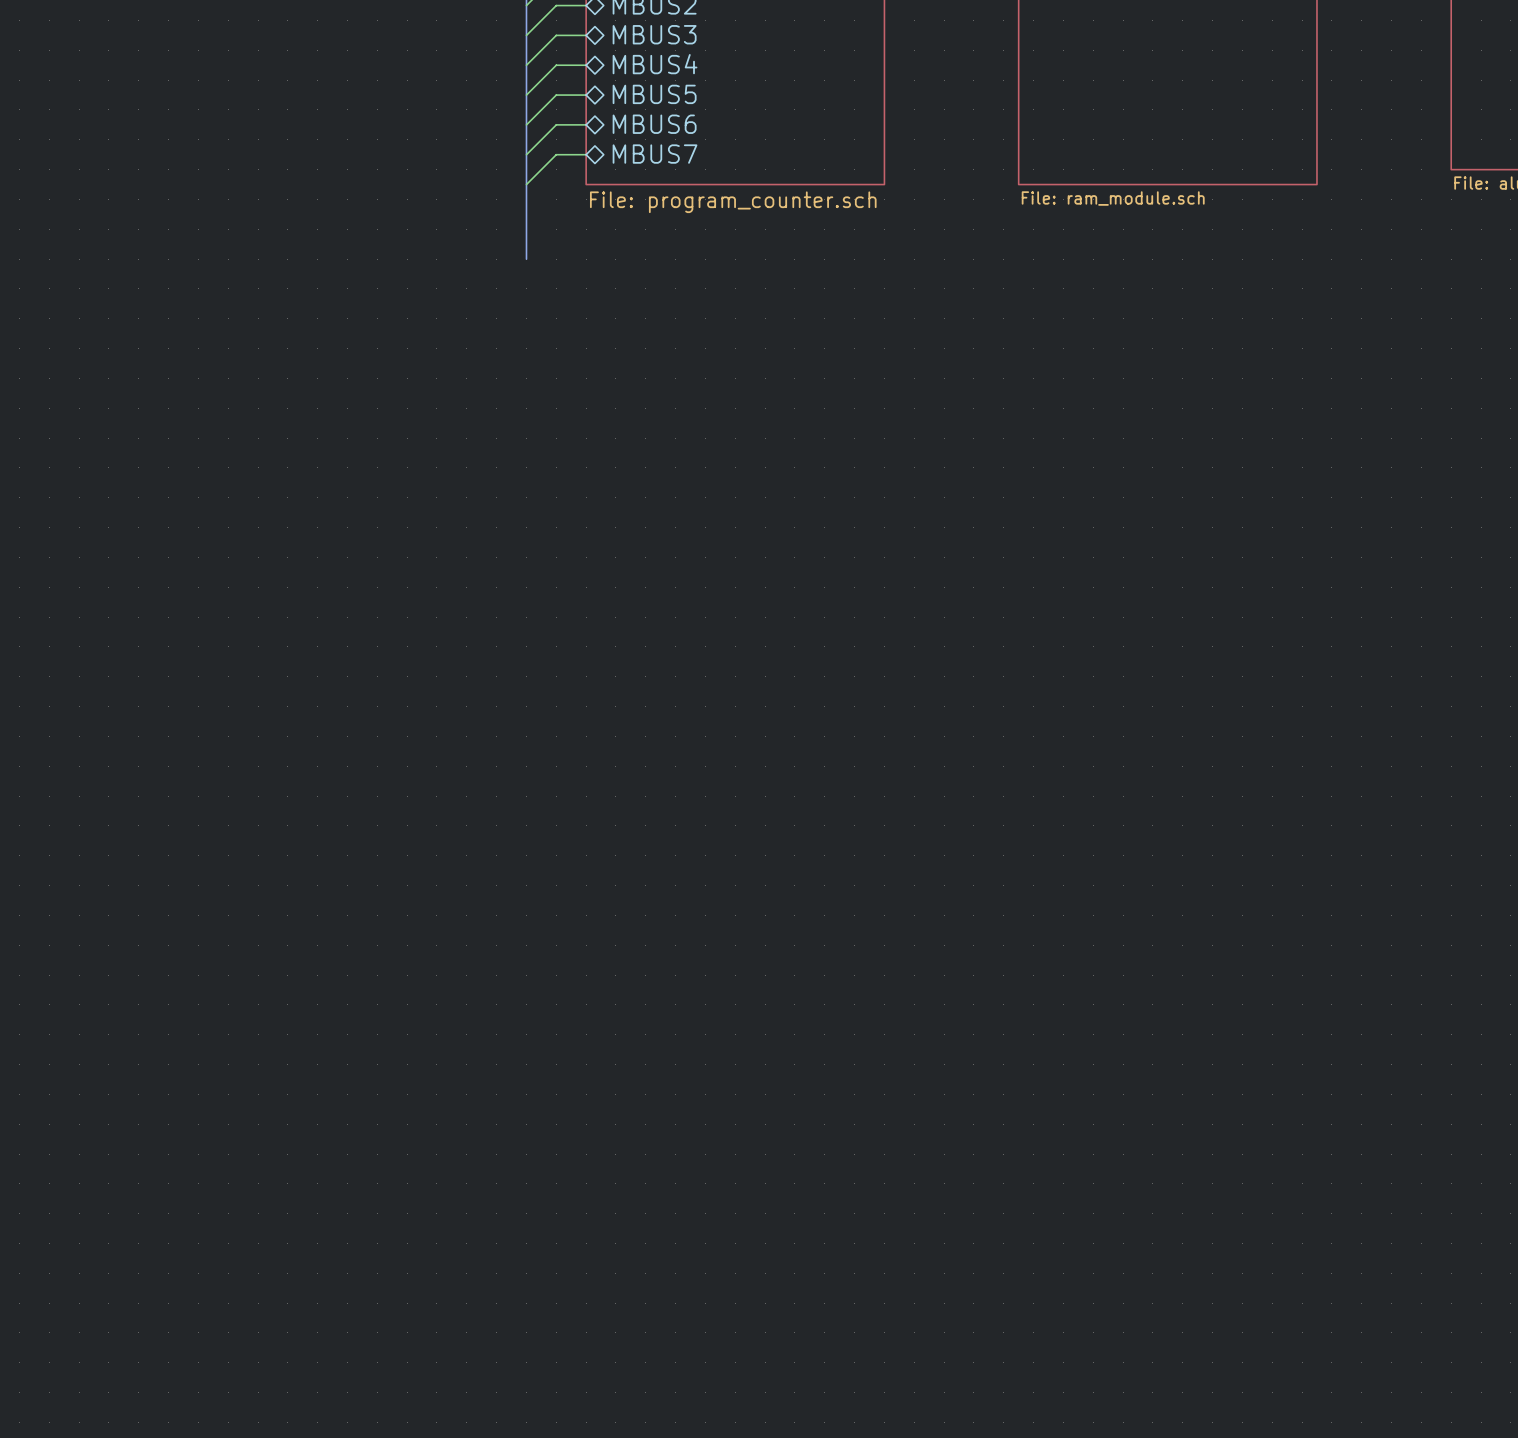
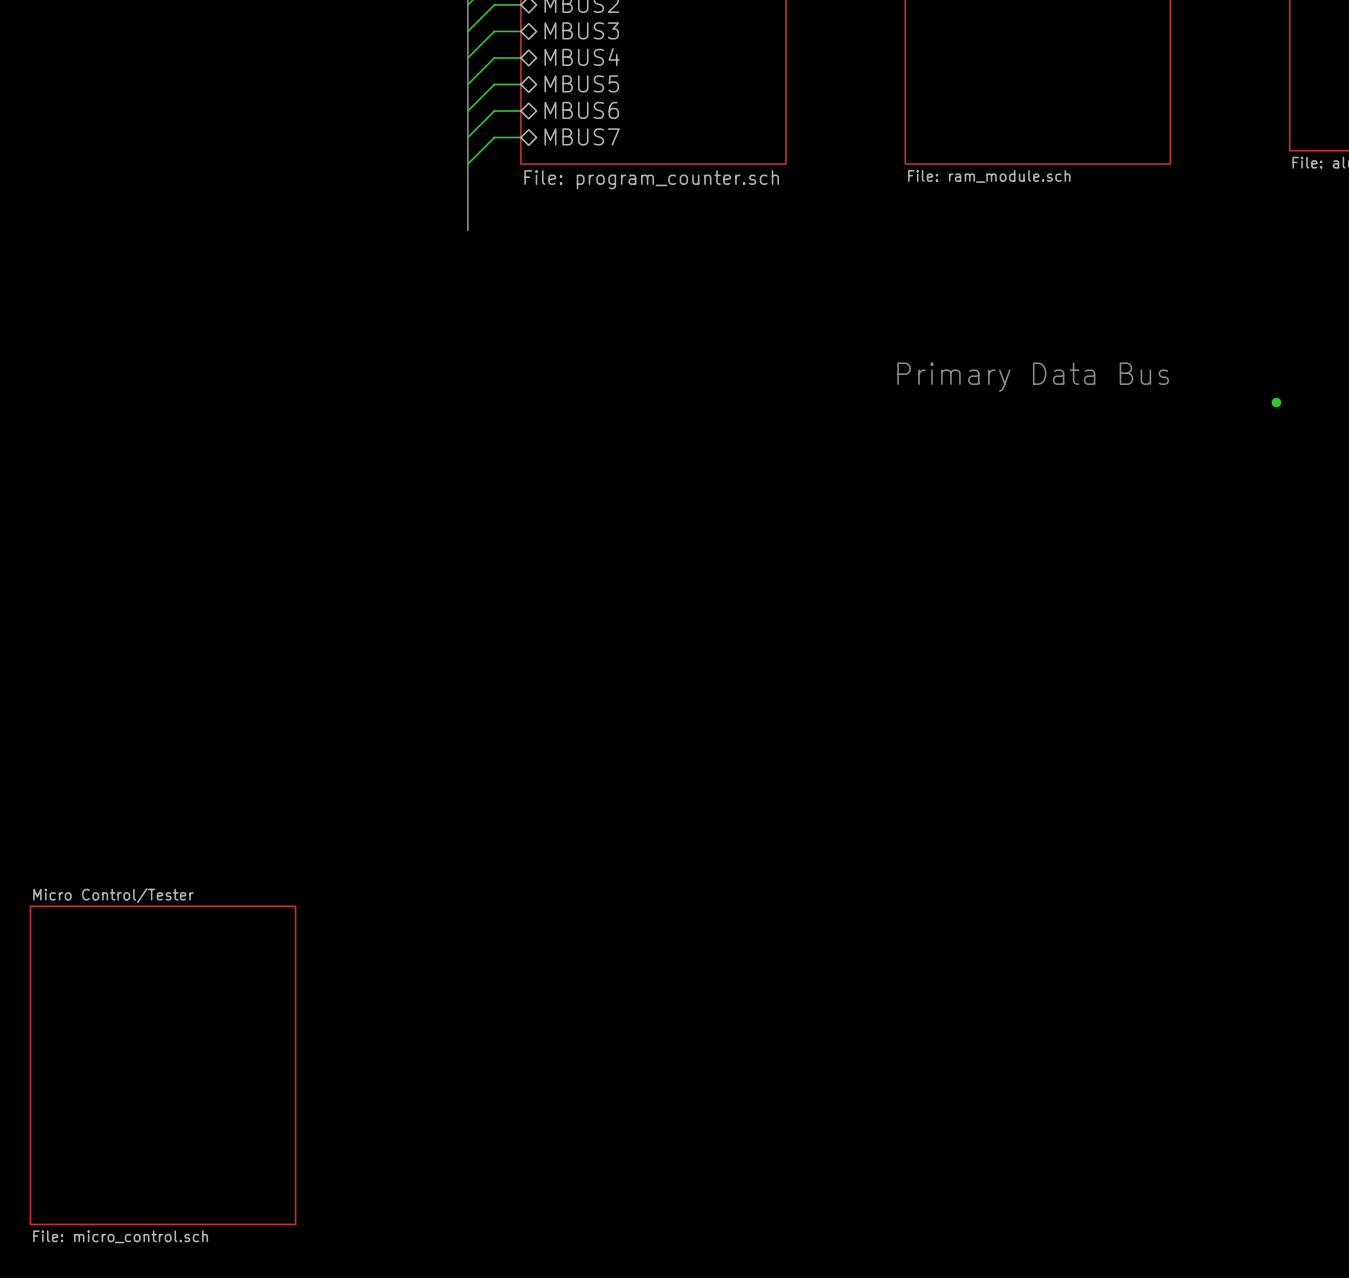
text: none -> Primary Data Bus (1033, 377)
junction: none -> (1276, 402)
sheet Micro Control/Tester: none -> File: micro_control.sch (163, 1065)

